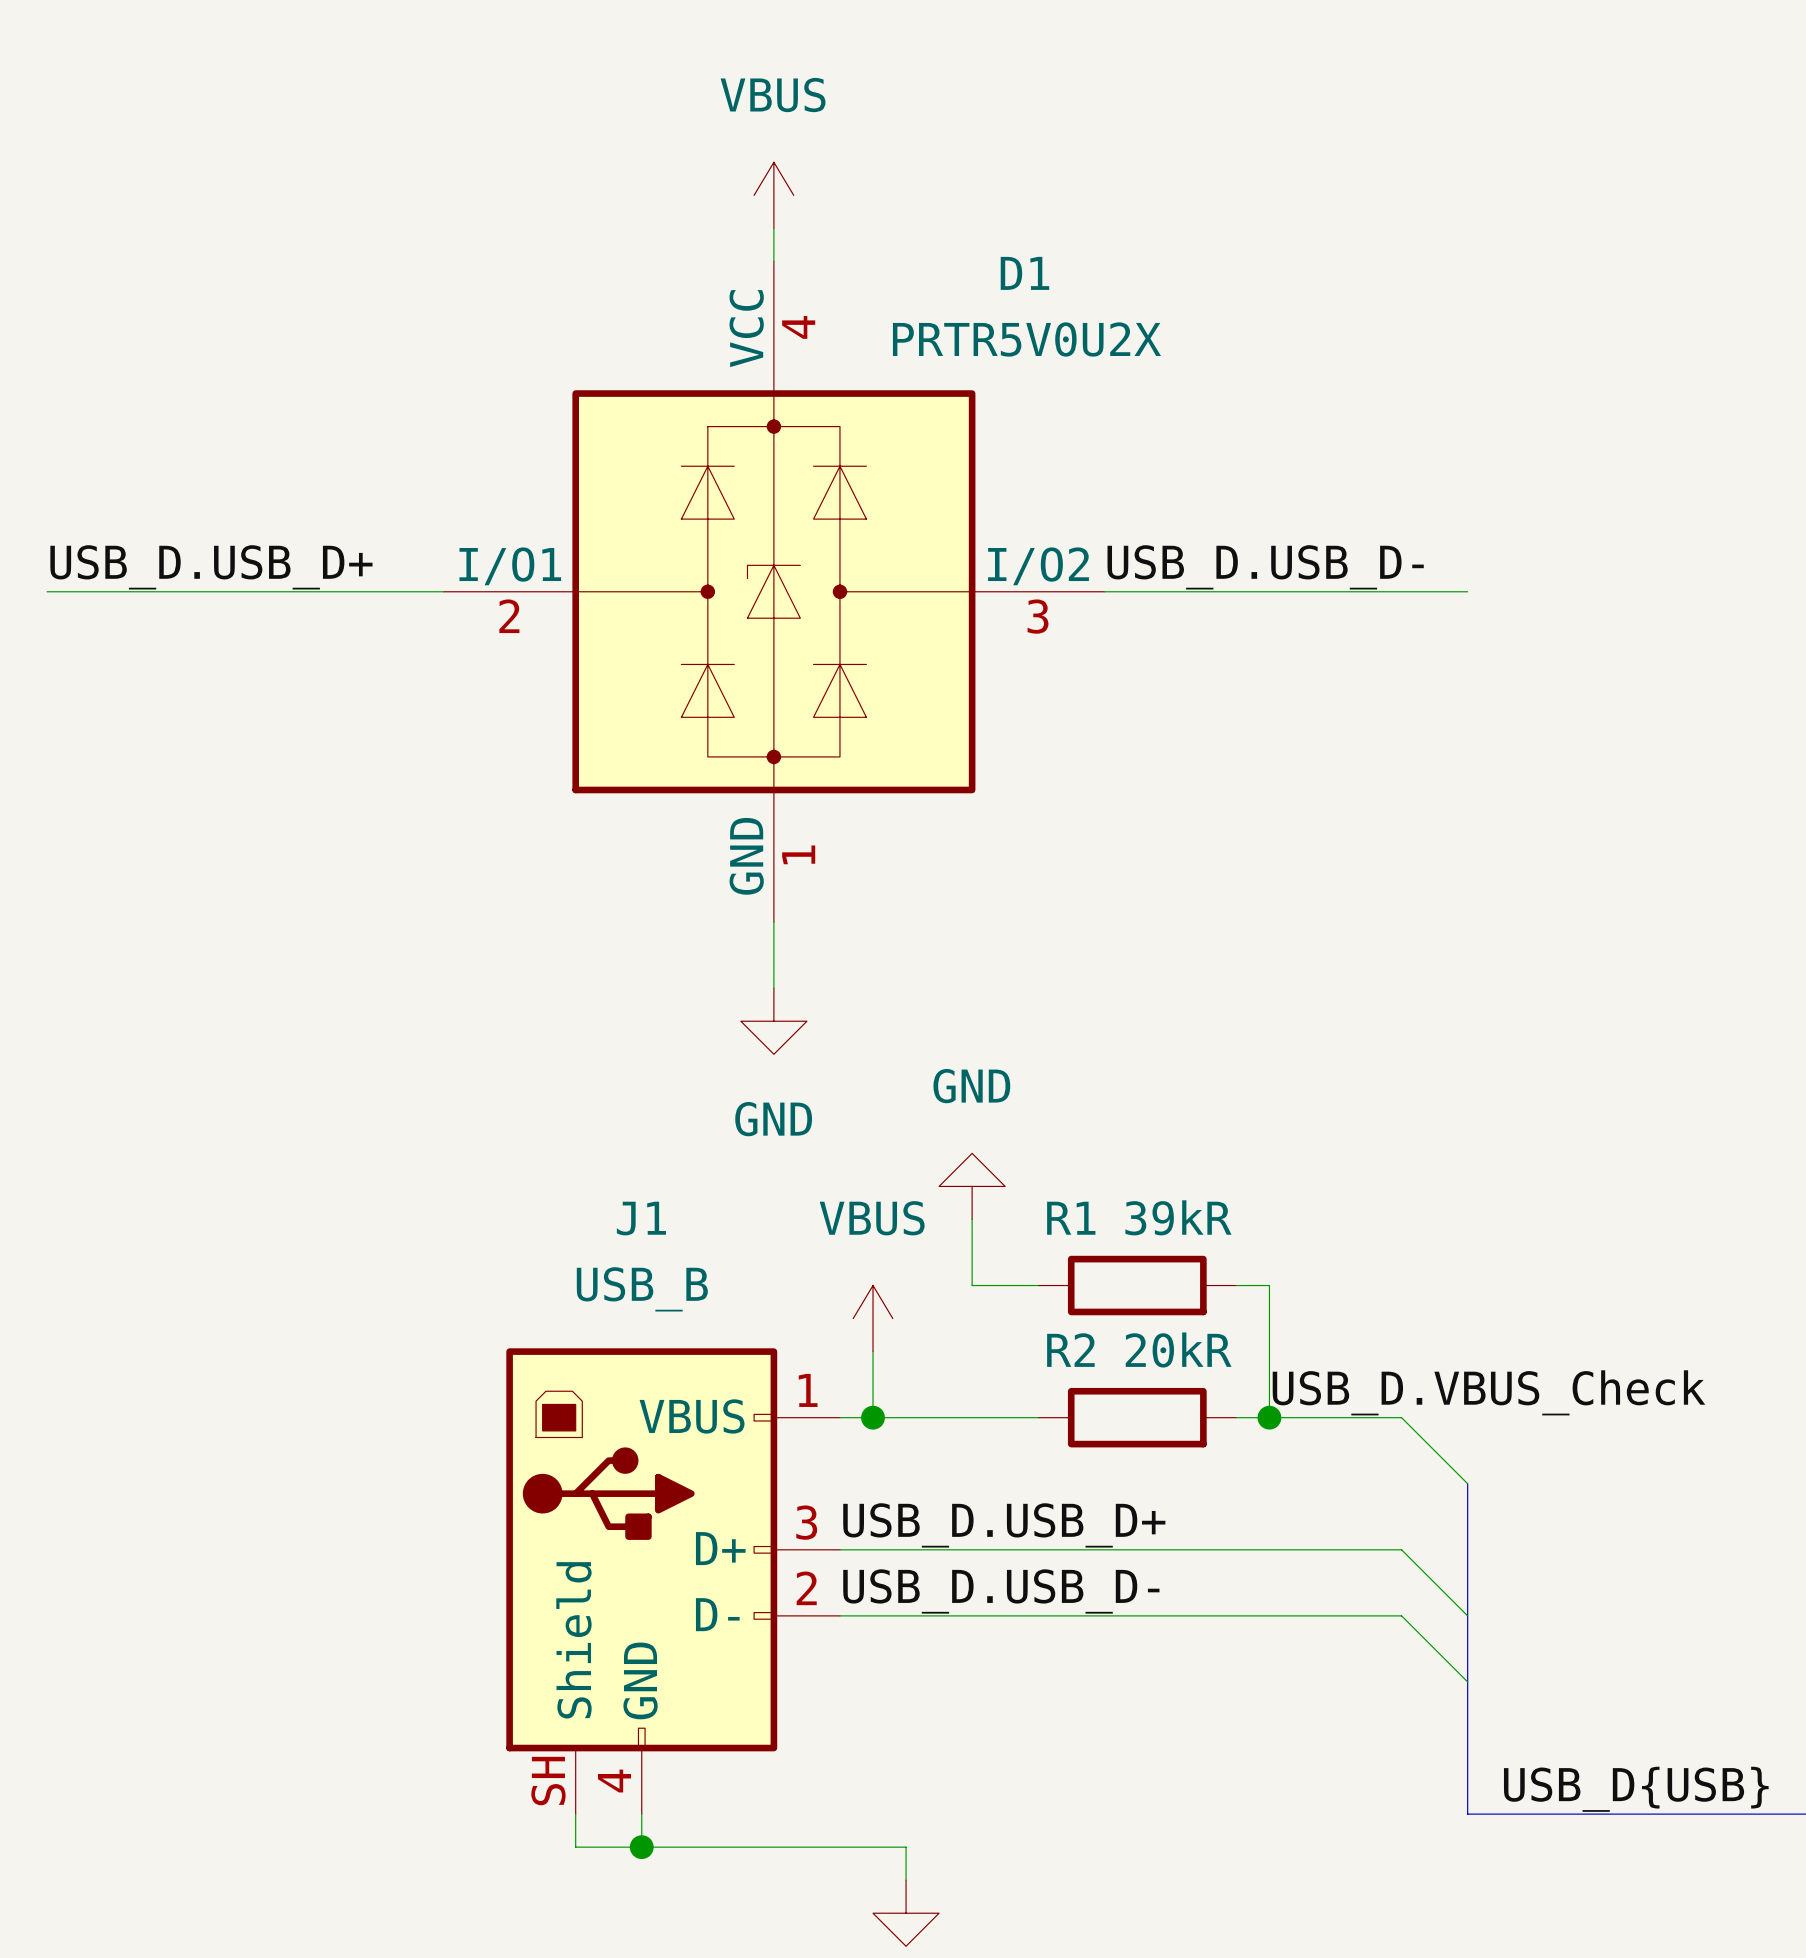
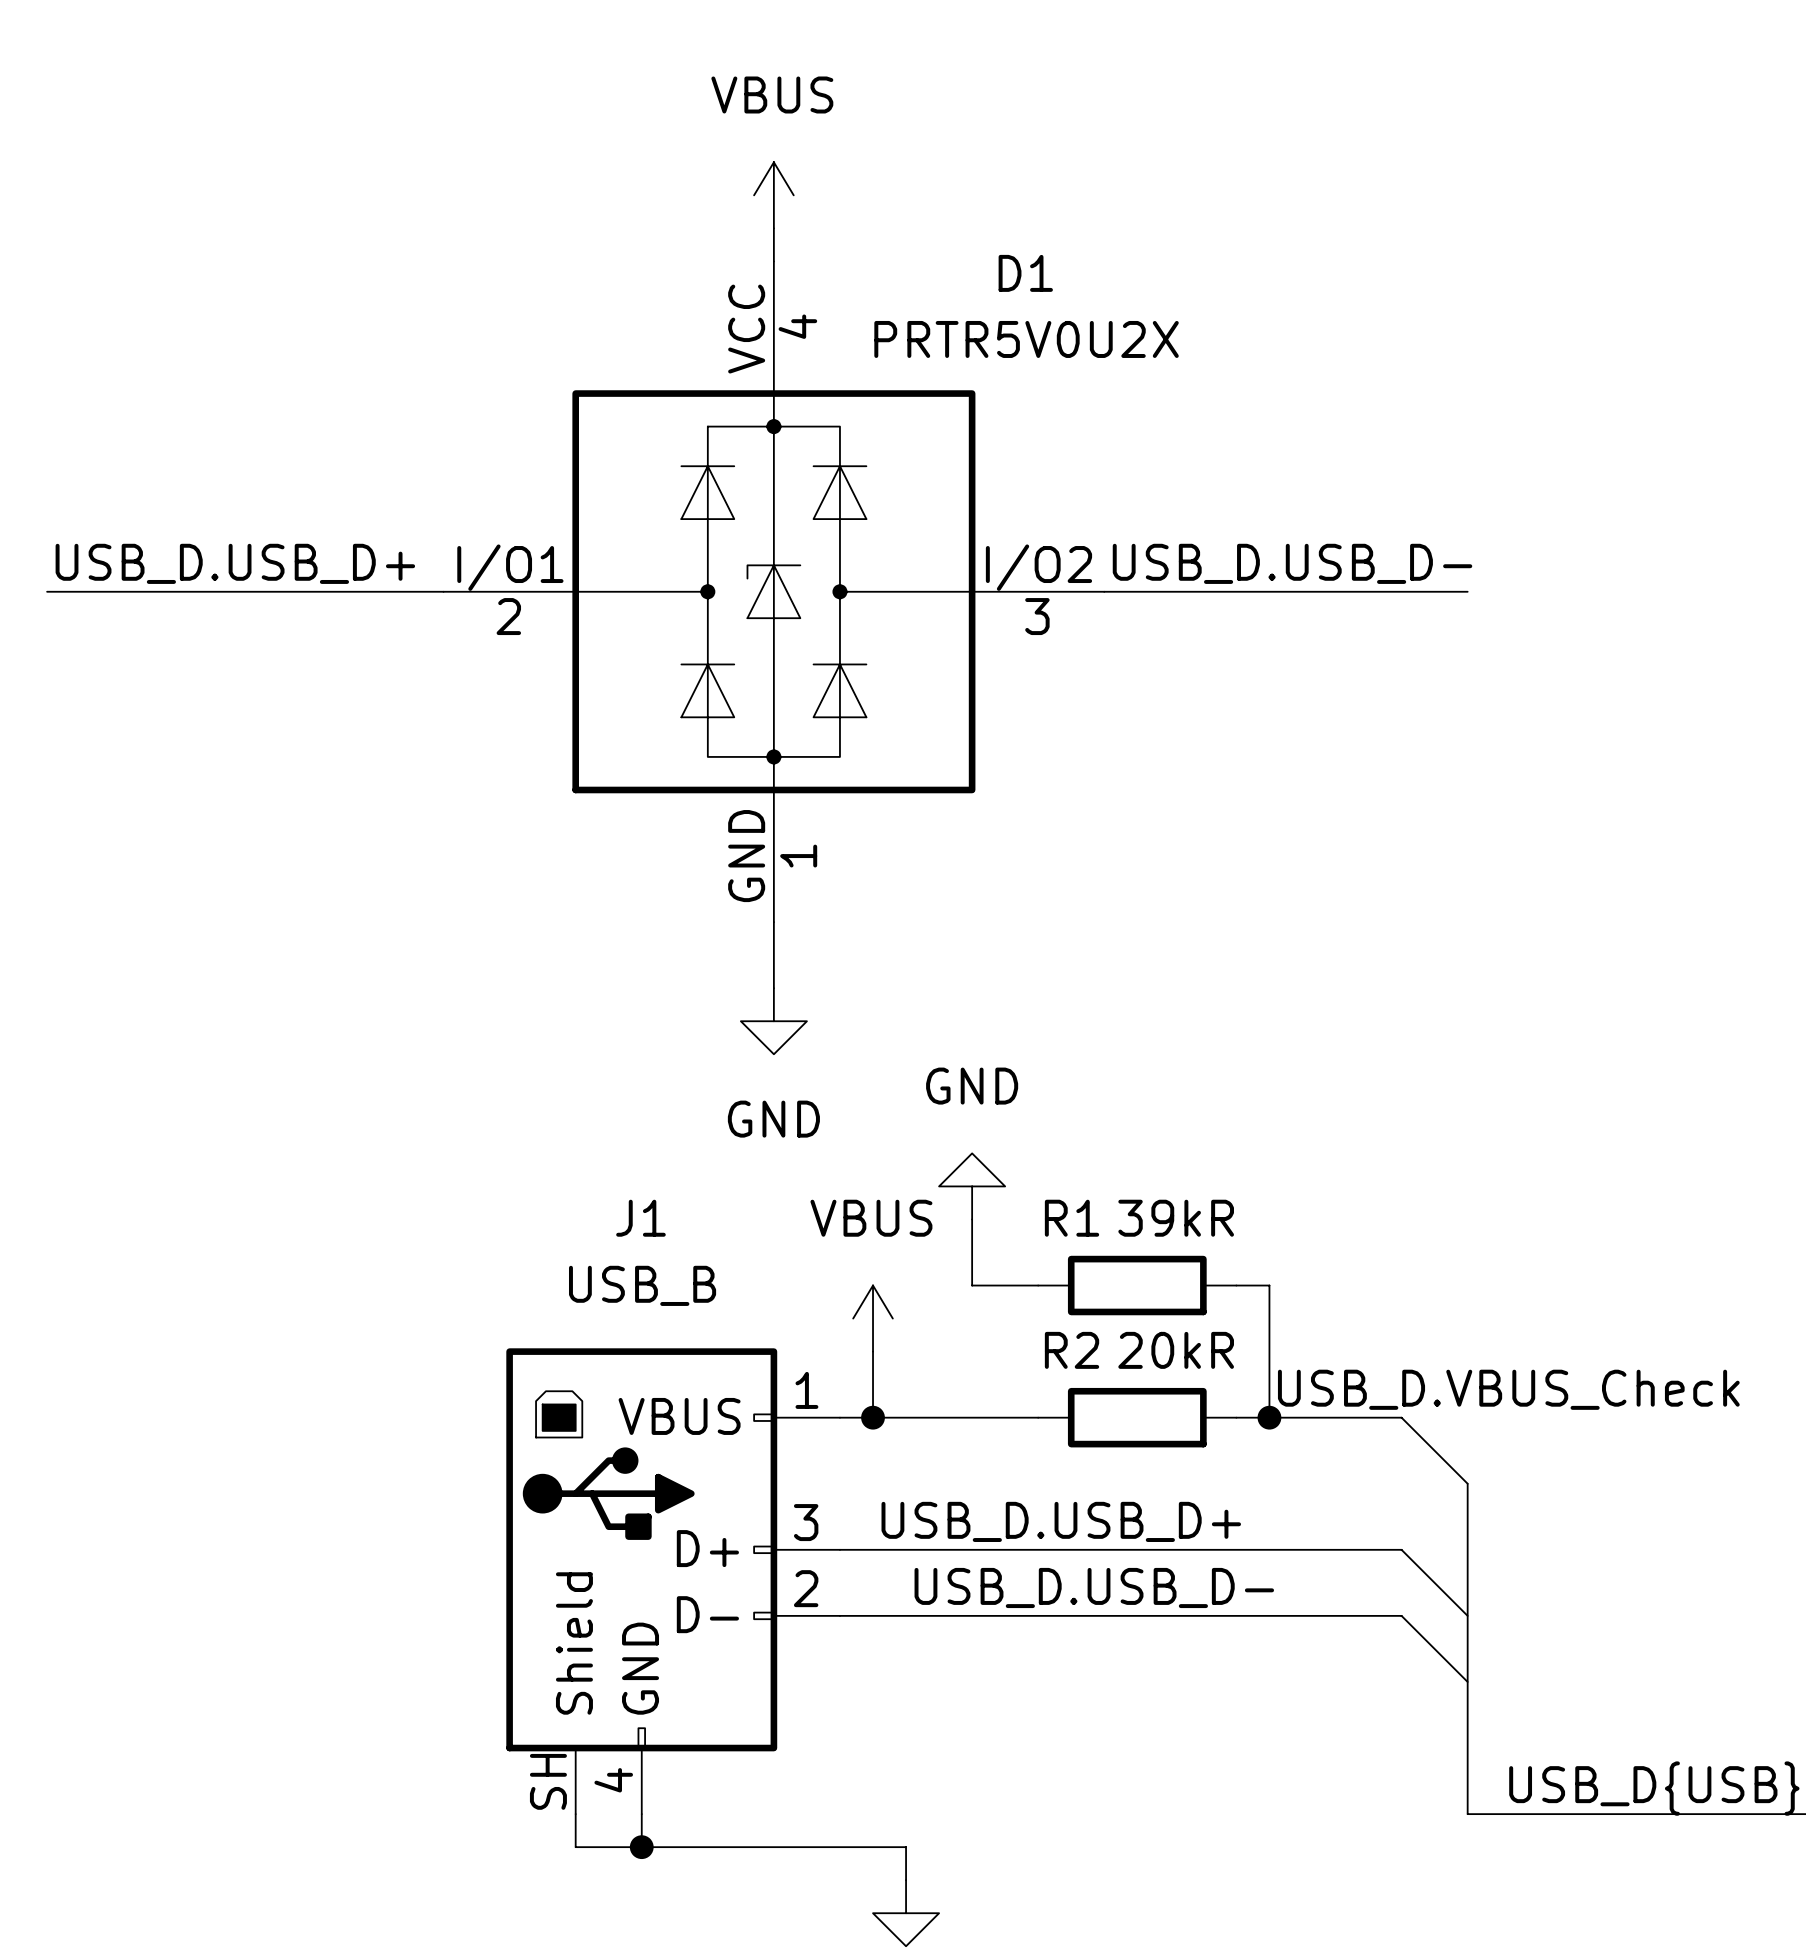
label position: USB_D.USB_D+ (1004, 1525) -> USB_D.USB_D+ (1061, 1521)
label position: USB_D.USB_D- (1001, 1591) -> USB_D.USB_D- (1094, 1587)

